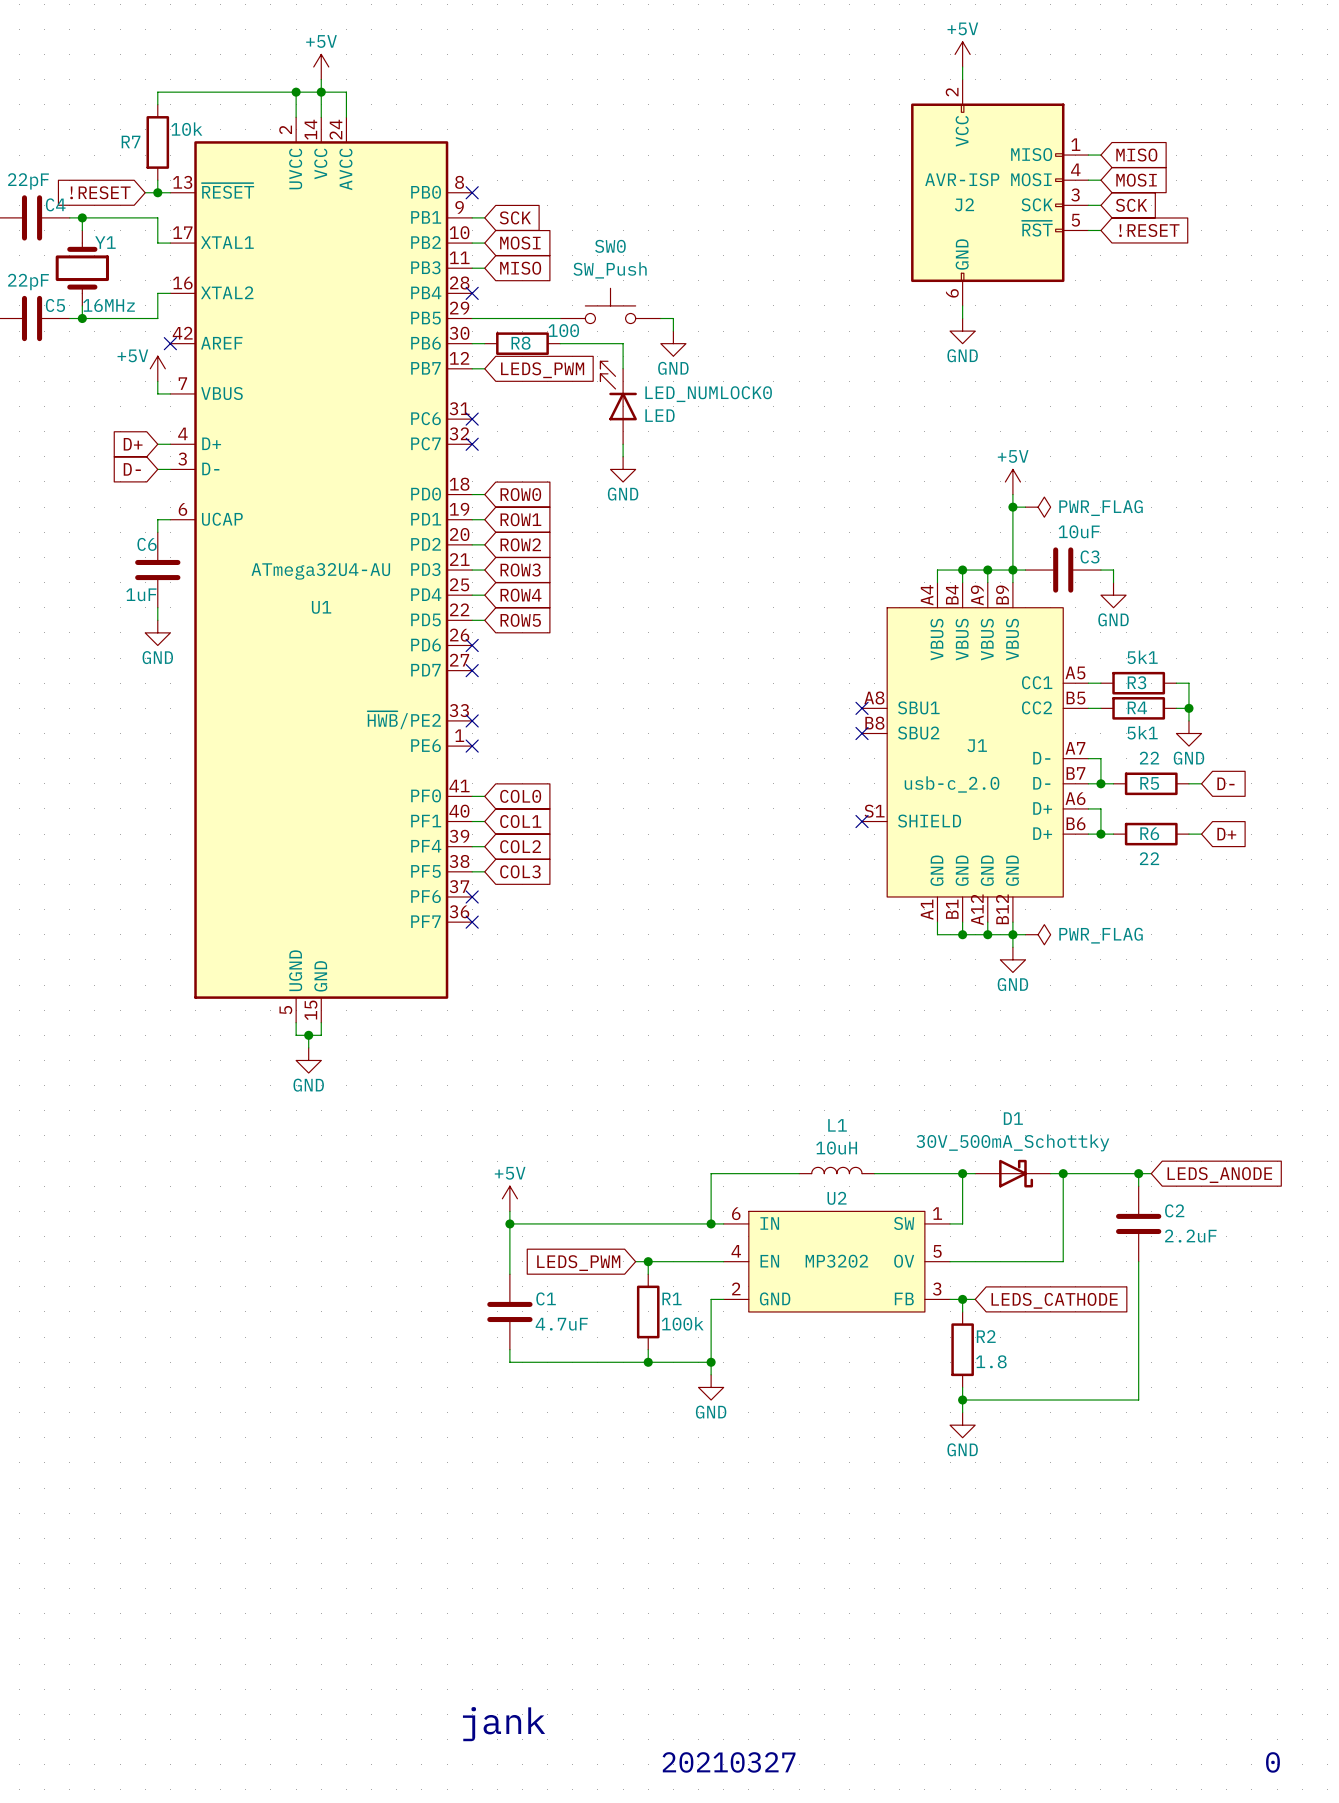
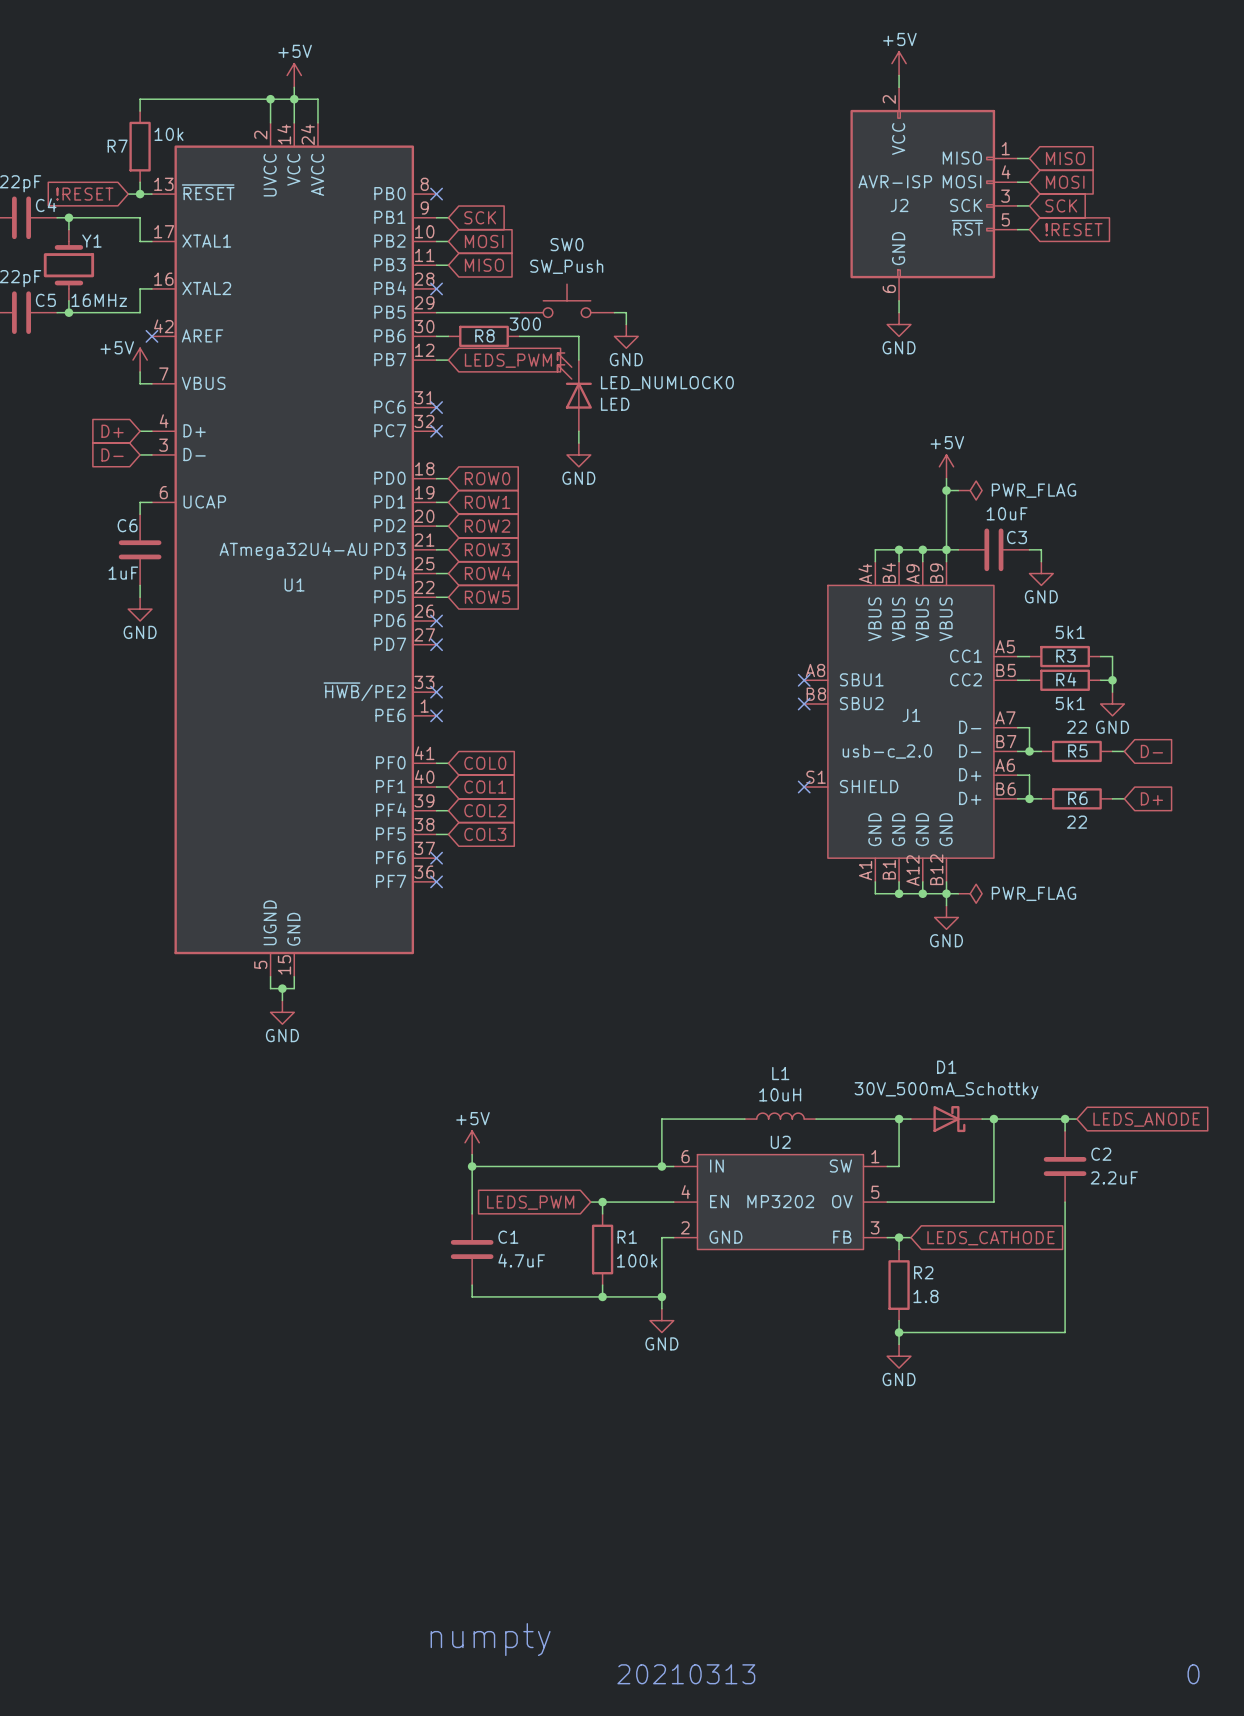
R8 value: 100 (563, 330) -> 300 (525, 324)
text: jank (504, 1724) -> numpty (490, 1639)
text: 20210327 (729, 1762) -> 20210313 (686, 1674)

